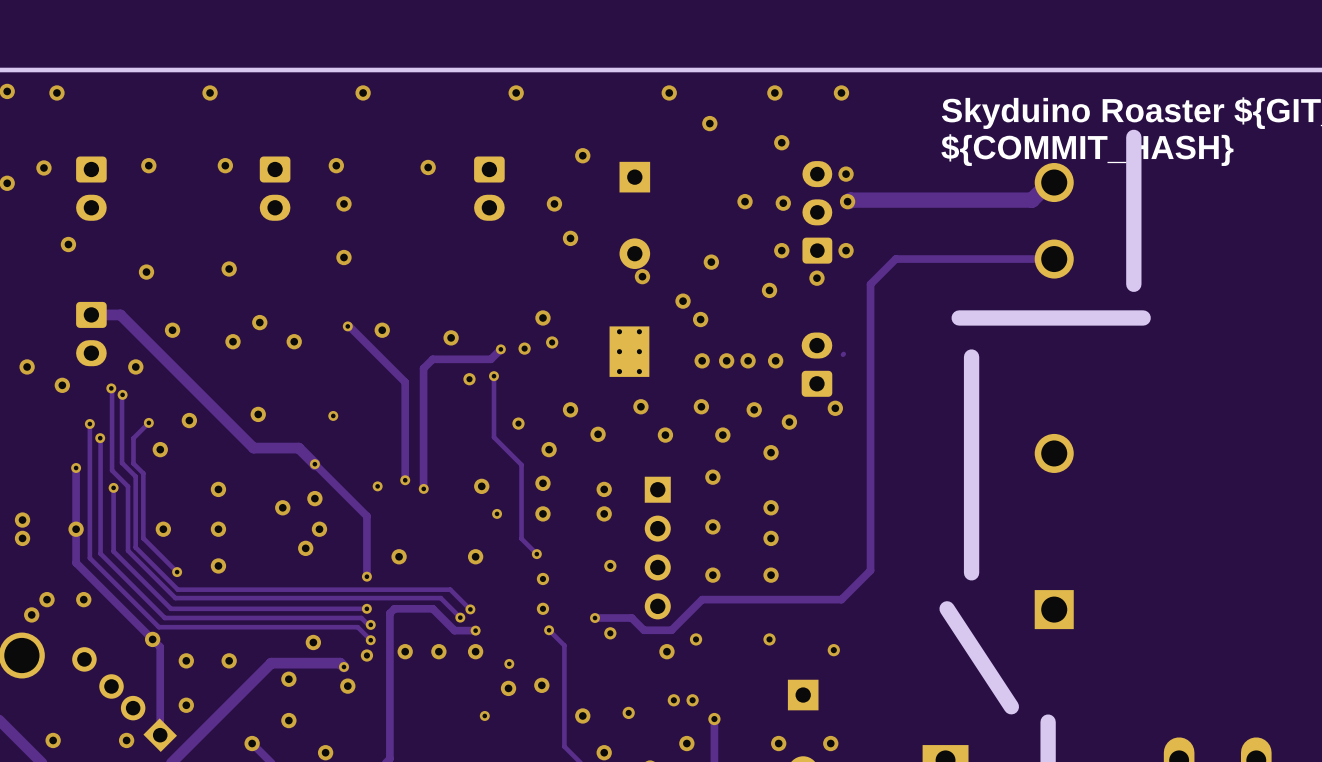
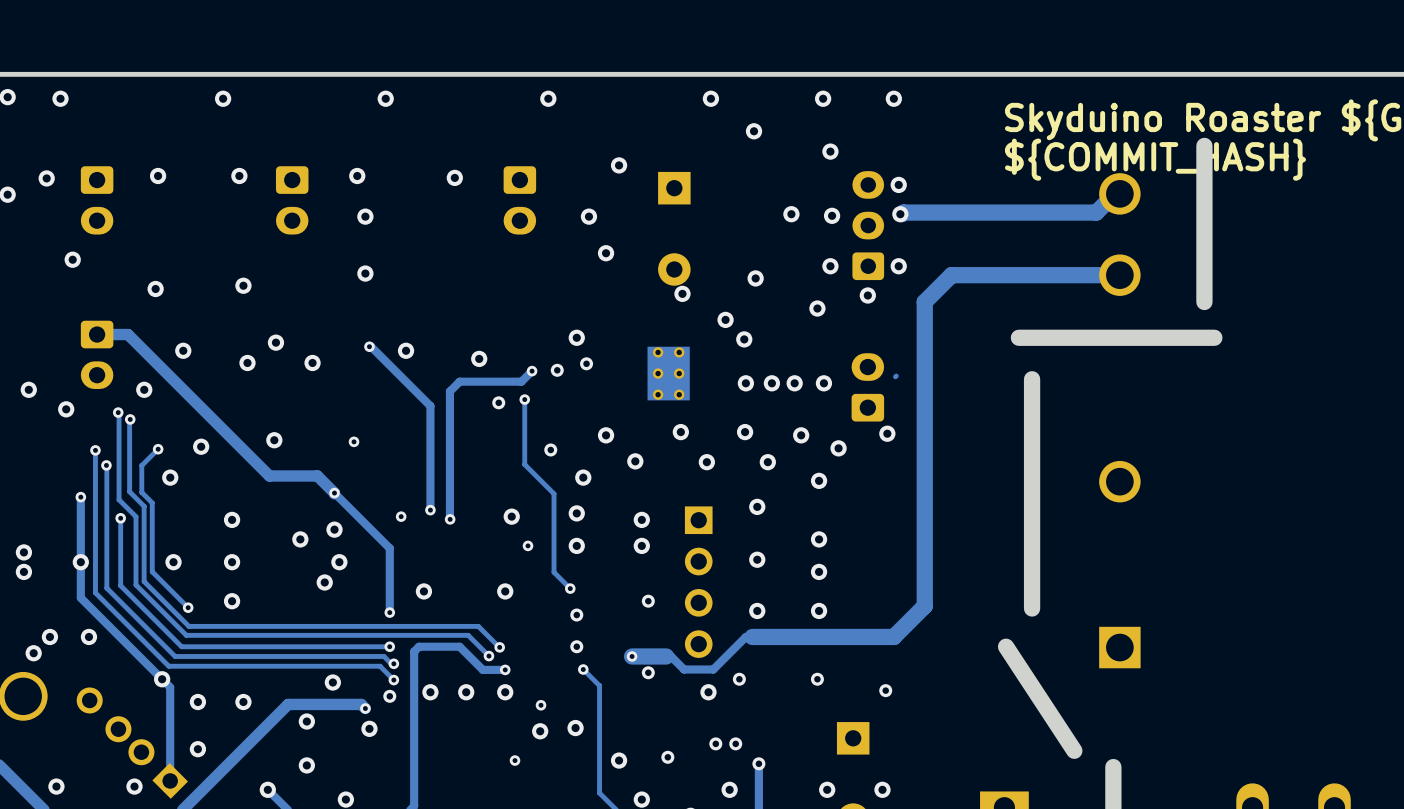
track width: thin (1054, 259) (895, 259) (870, 284) (870, 570) (841, 599) (708, 599) -> thick (1119, 275) (951, 275) (924, 302) (924, 606) (893, 636) (752, 636)
track width: thin (627, 618) (595, 618) -> thick (666, 656) (632, 656)

